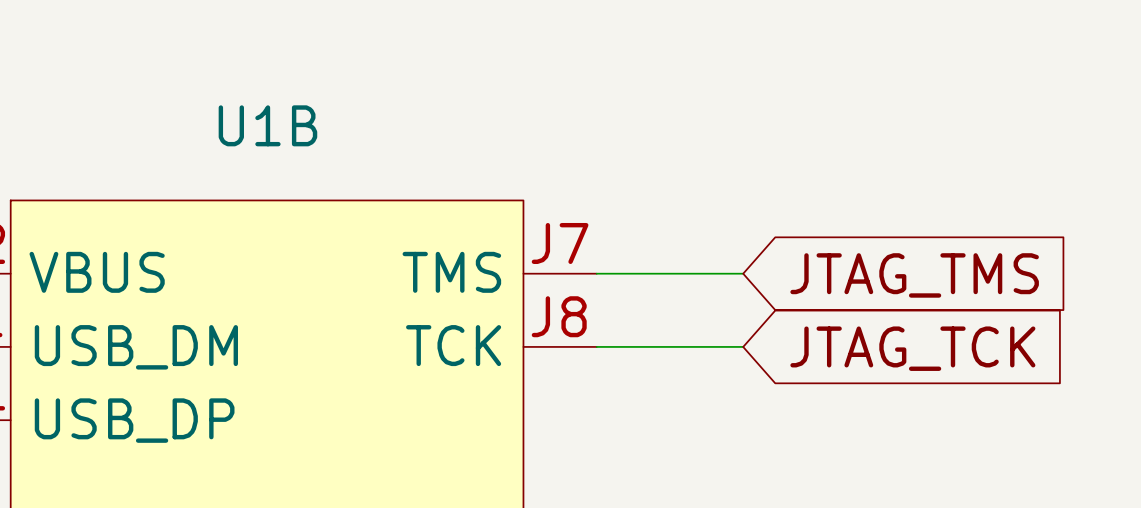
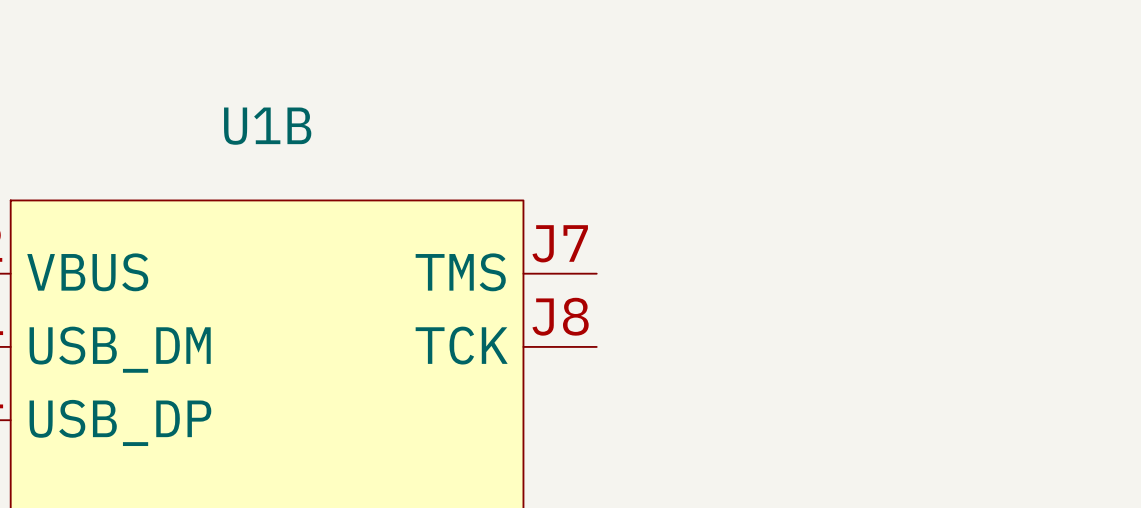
wire: (596, 273) (743, 273) -> none
global label: JTAG_TMS (914, 275) -> none
wire: (596, 346) (743, 346) -> none
global label: JTAG_TCK (912, 348) -> none

